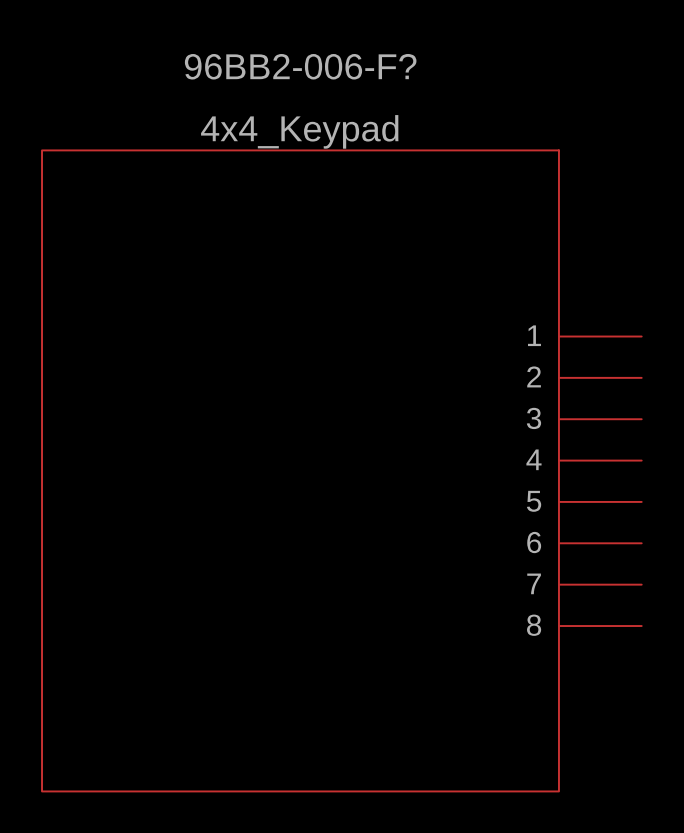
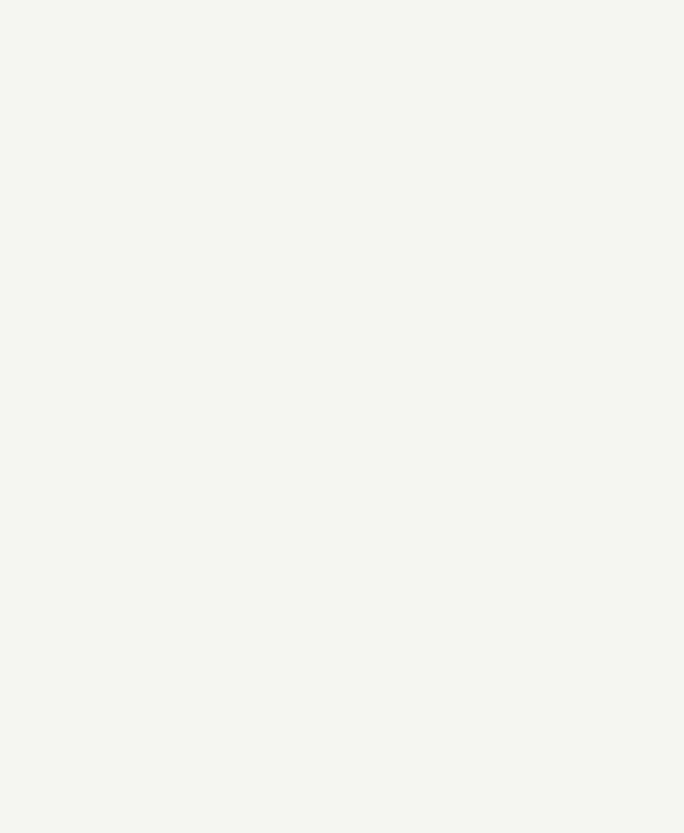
96BB2-006-F?: 4x4_Keypad (341, 470) -> none

